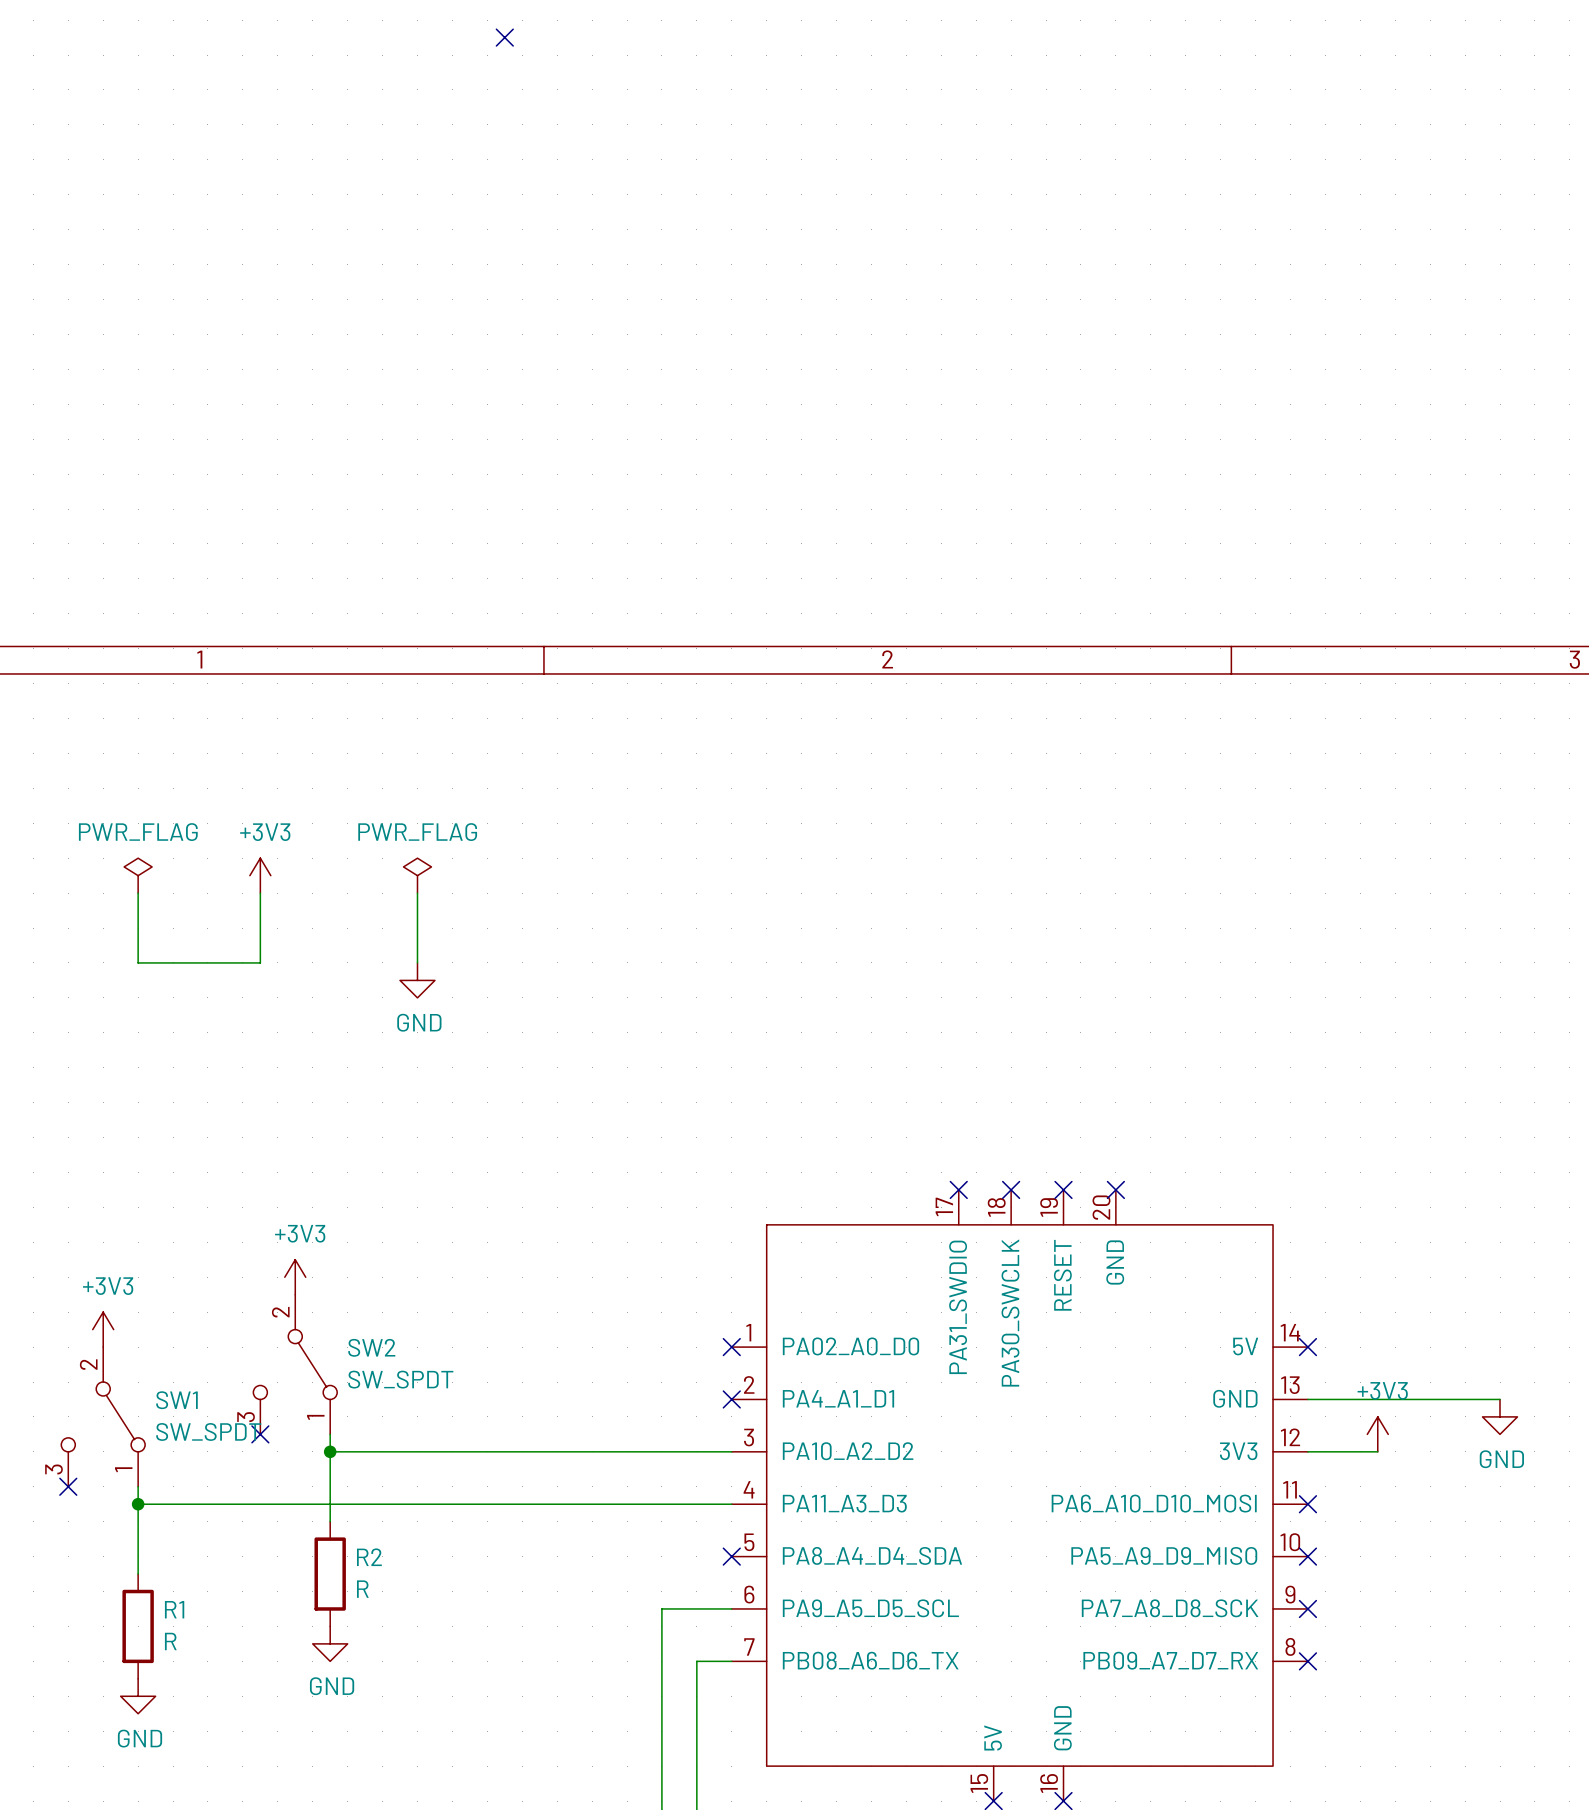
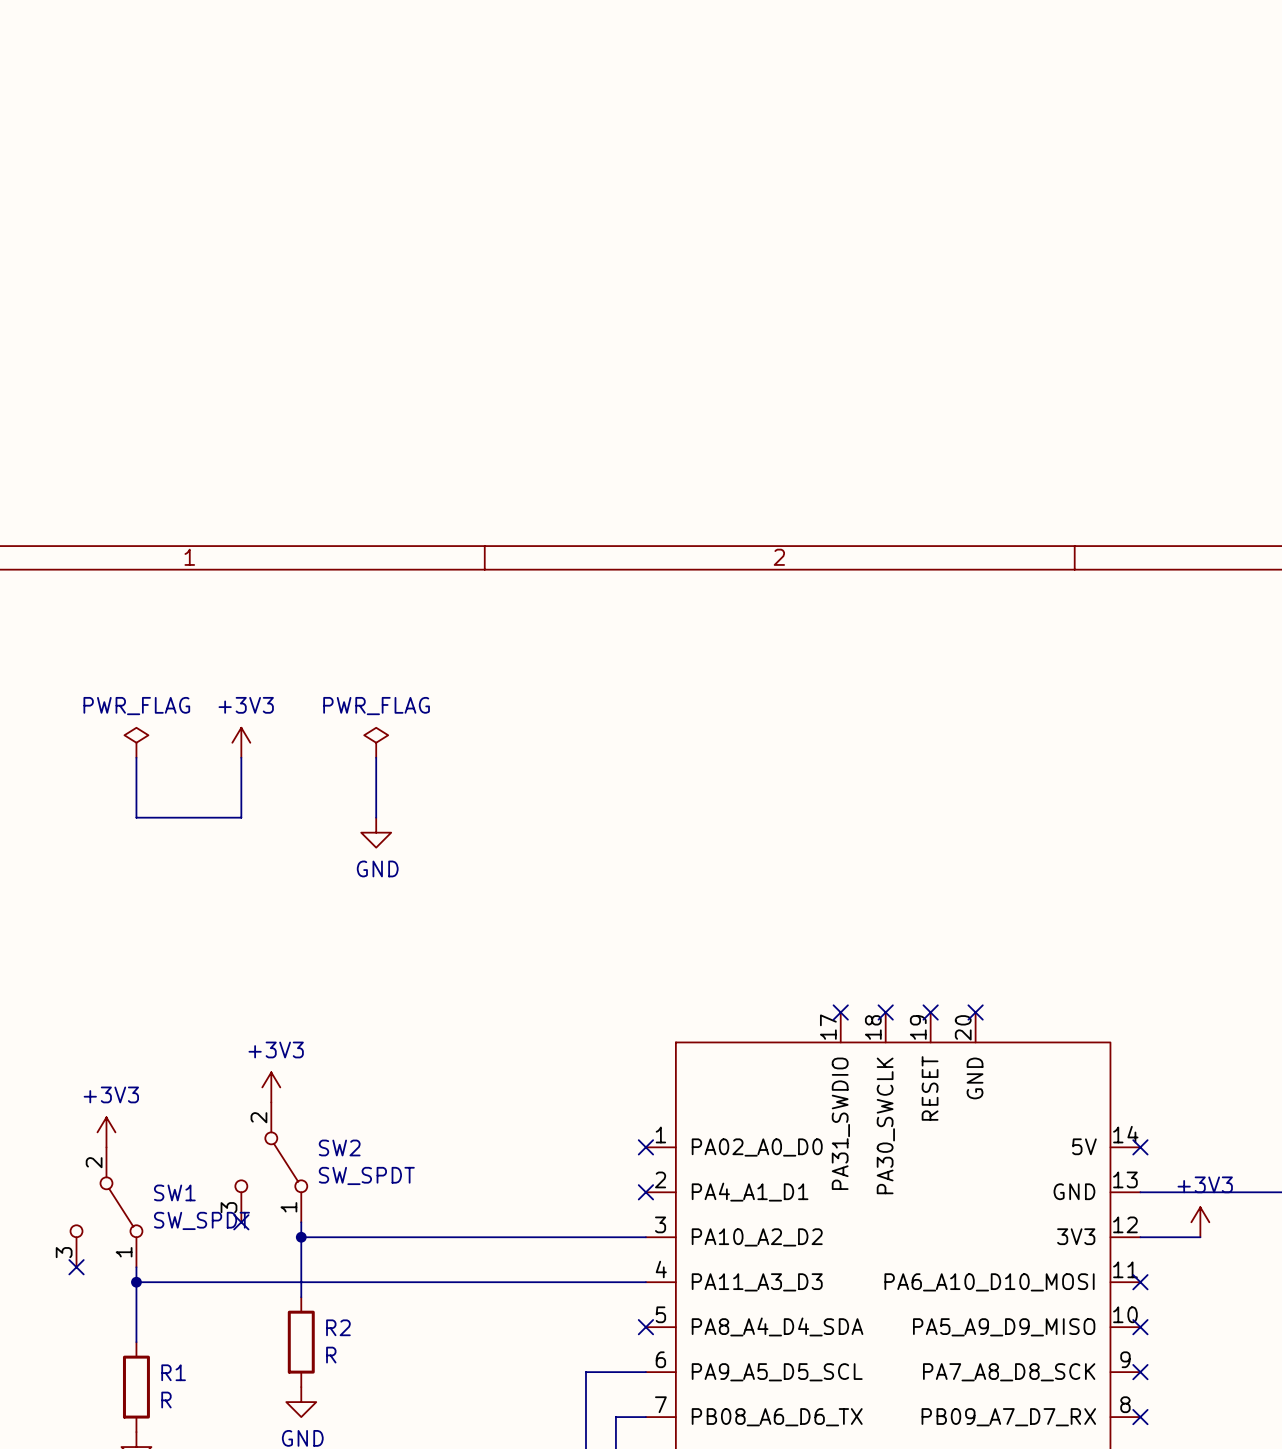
no-connect mark: (504, 37) -> none

